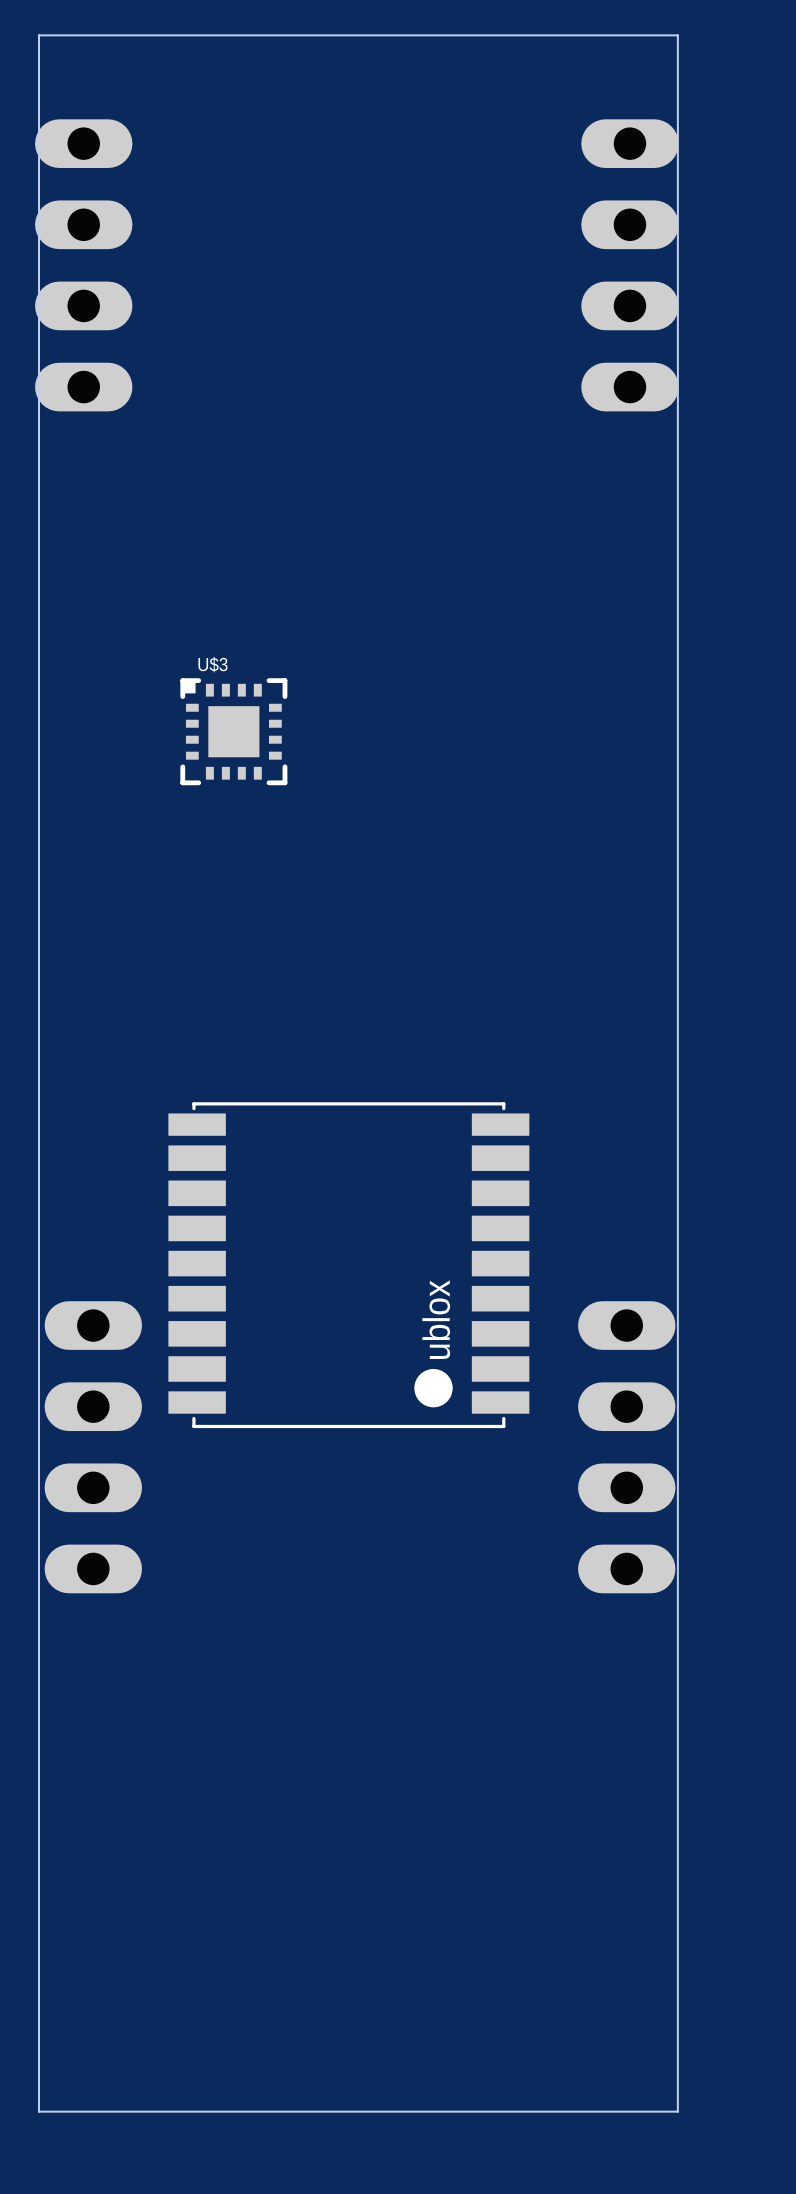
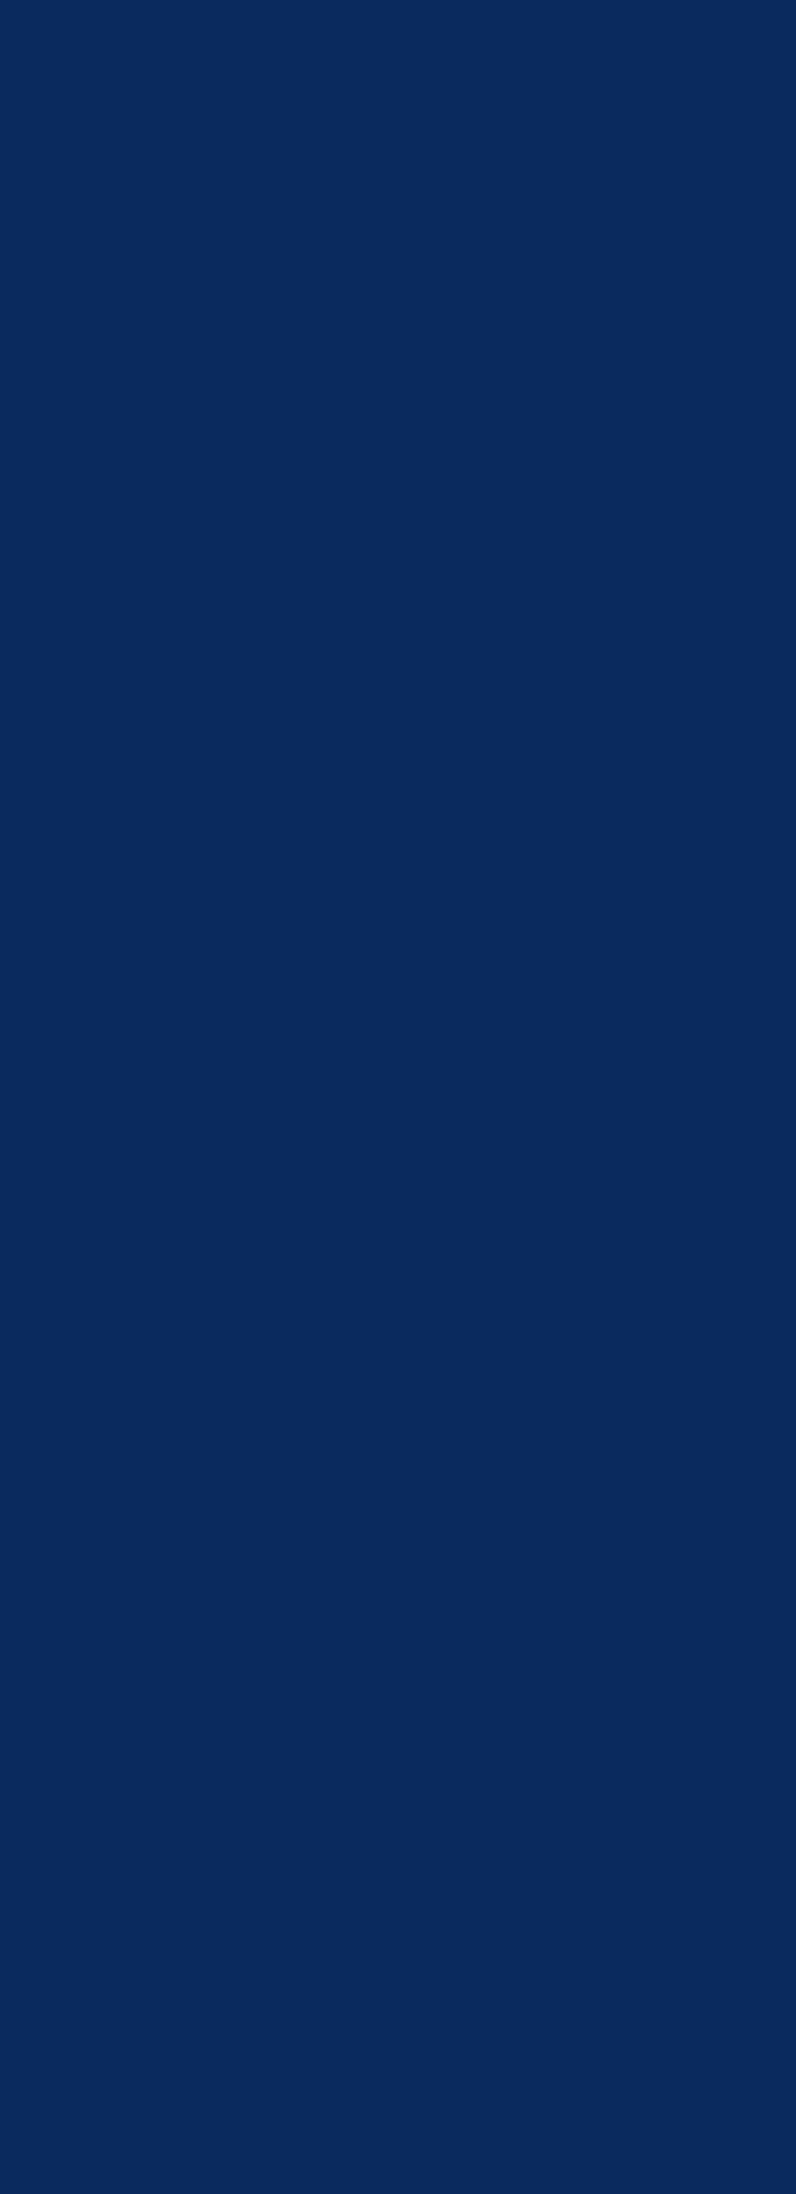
board edge: (39, 35) (677, 35) (677, 2111) (39, 2111) (39, 35) -> none
part: (83, 265) -> none
part: (629, 265) -> none
U$3: (233, 731) -> none
part: (348, 1265) -> none
part: (93, 1447) -> none
part: (626, 1447) -> none

